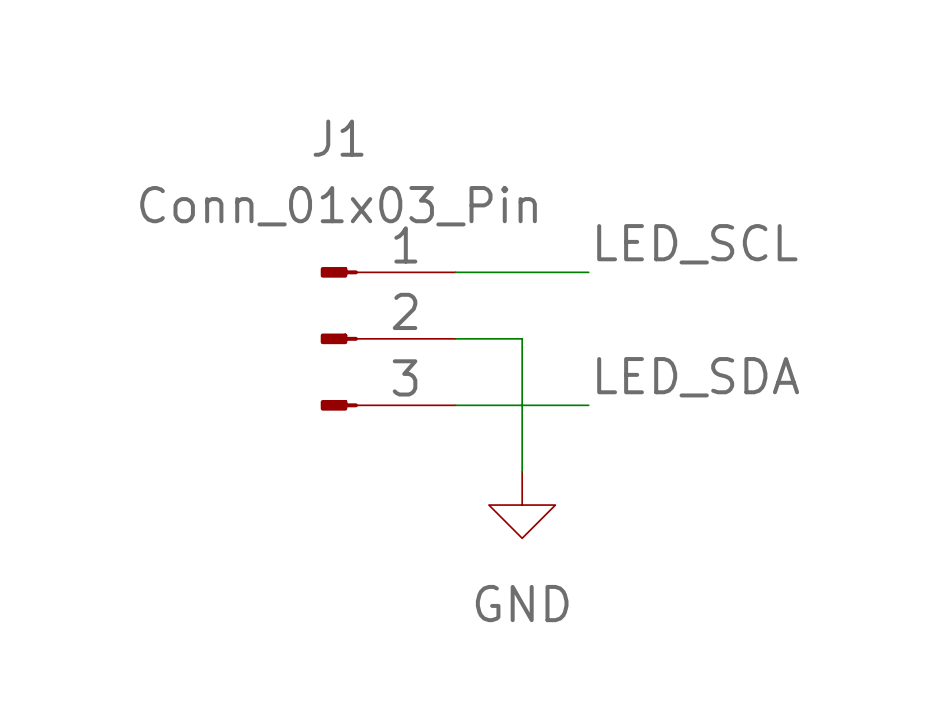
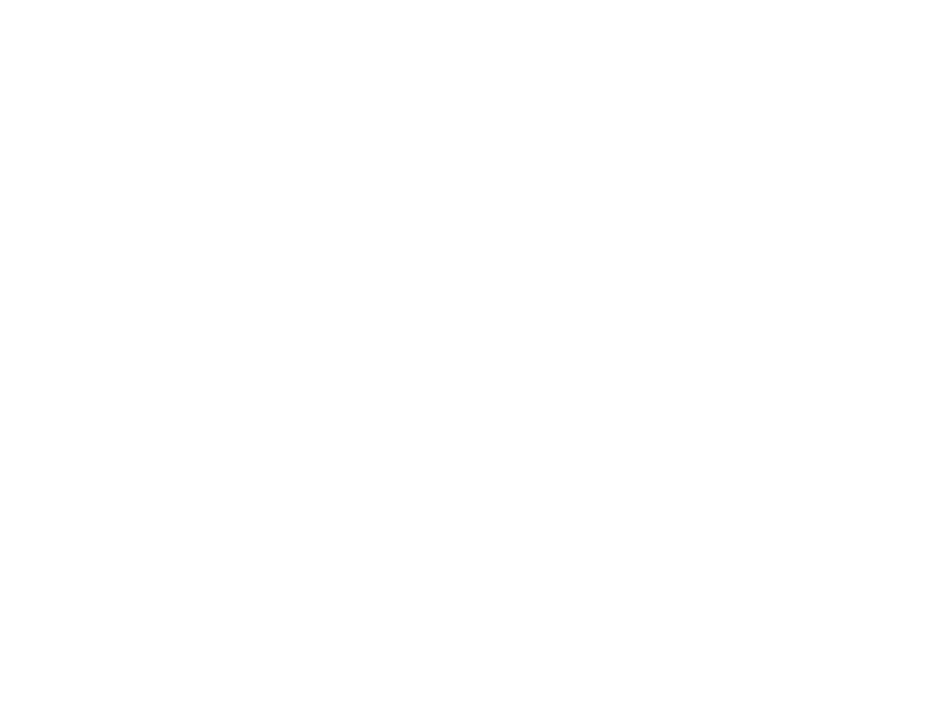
label: LED_SCL (697, 244) -> none
wire: (455, 272) (588, 272) -> none
J1: Conn_01x03_Pin (388, 338) -> none
wire: (455, 338) (522, 338) (522, 471) -> none
label: LED_SDA (698, 377) -> none
wire: (455, 405) (588, 405) -> none
power symbol: GND (522, 505) -> none

